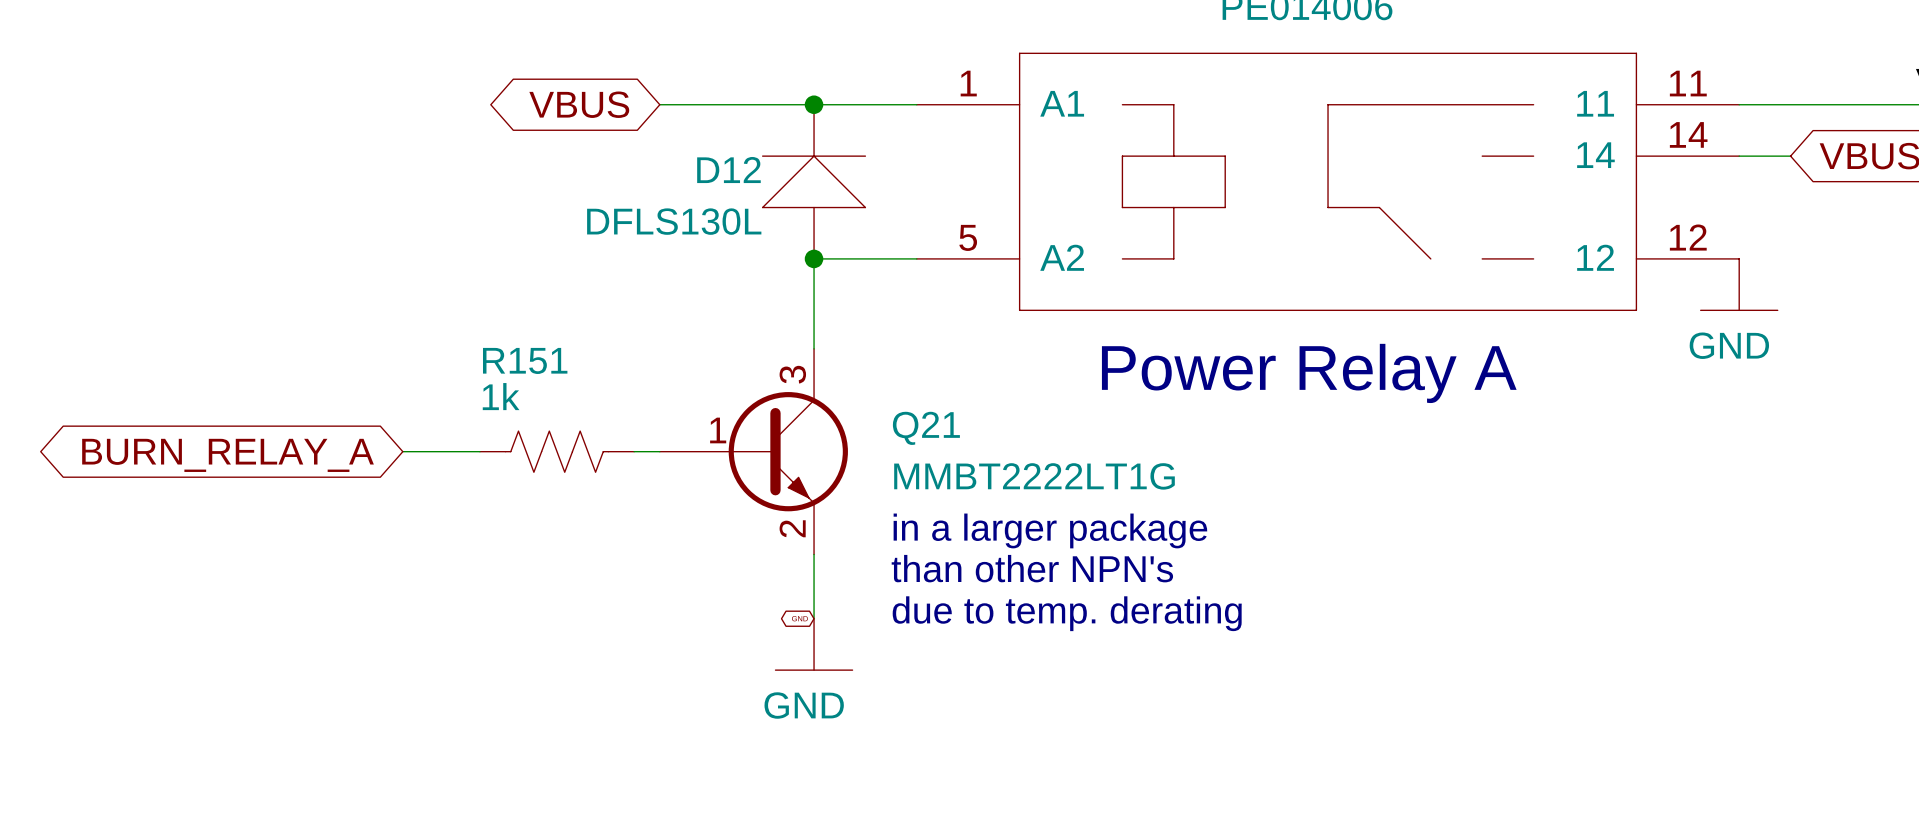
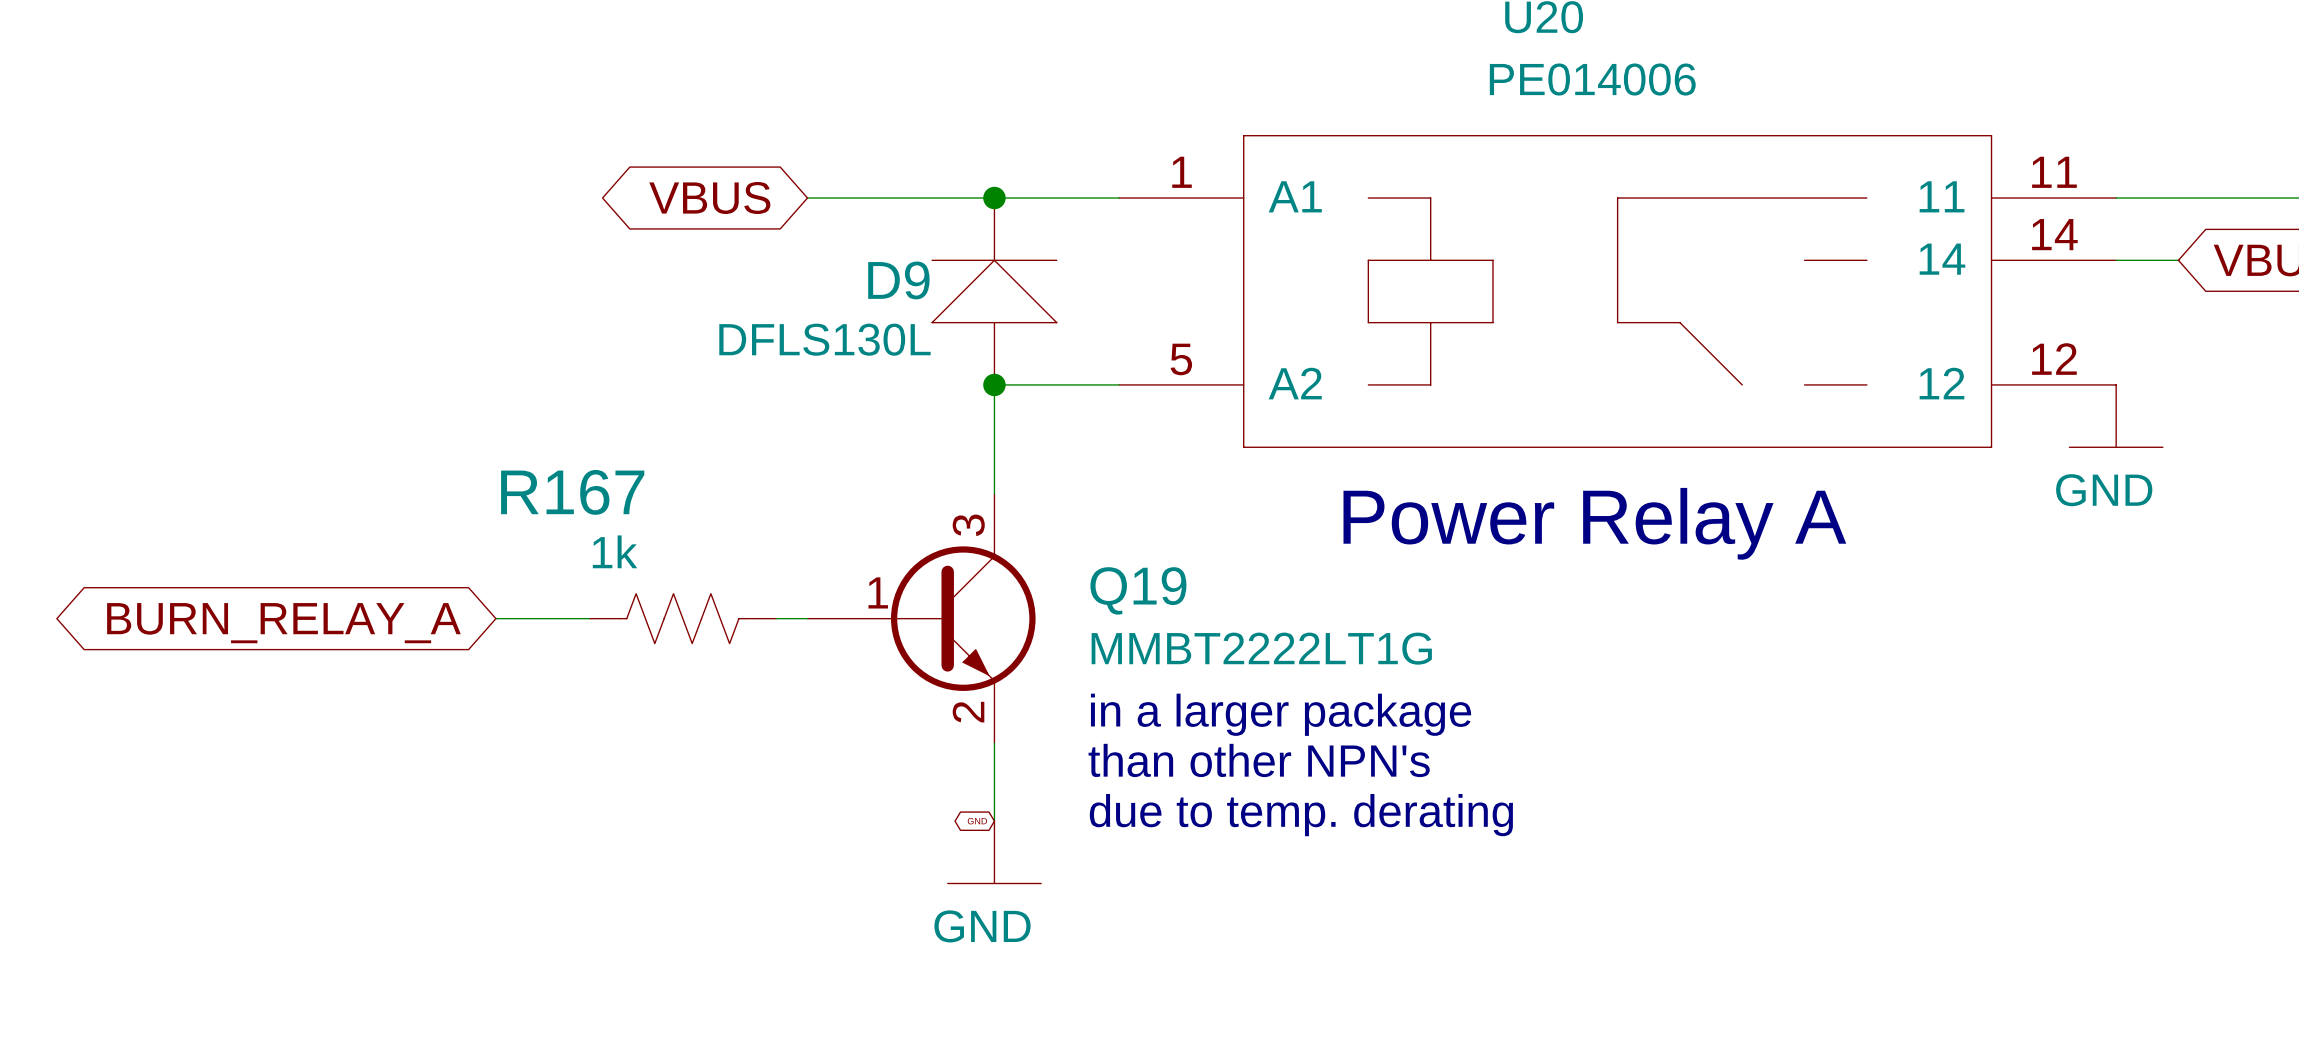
D12 name: D12 (728, 170) -> D9 (898, 280)
R151 name: R151 (525, 360) -> R167 (572, 492)
Q21 name: Q21 (926, 428) -> Q19 (1138, 590)

